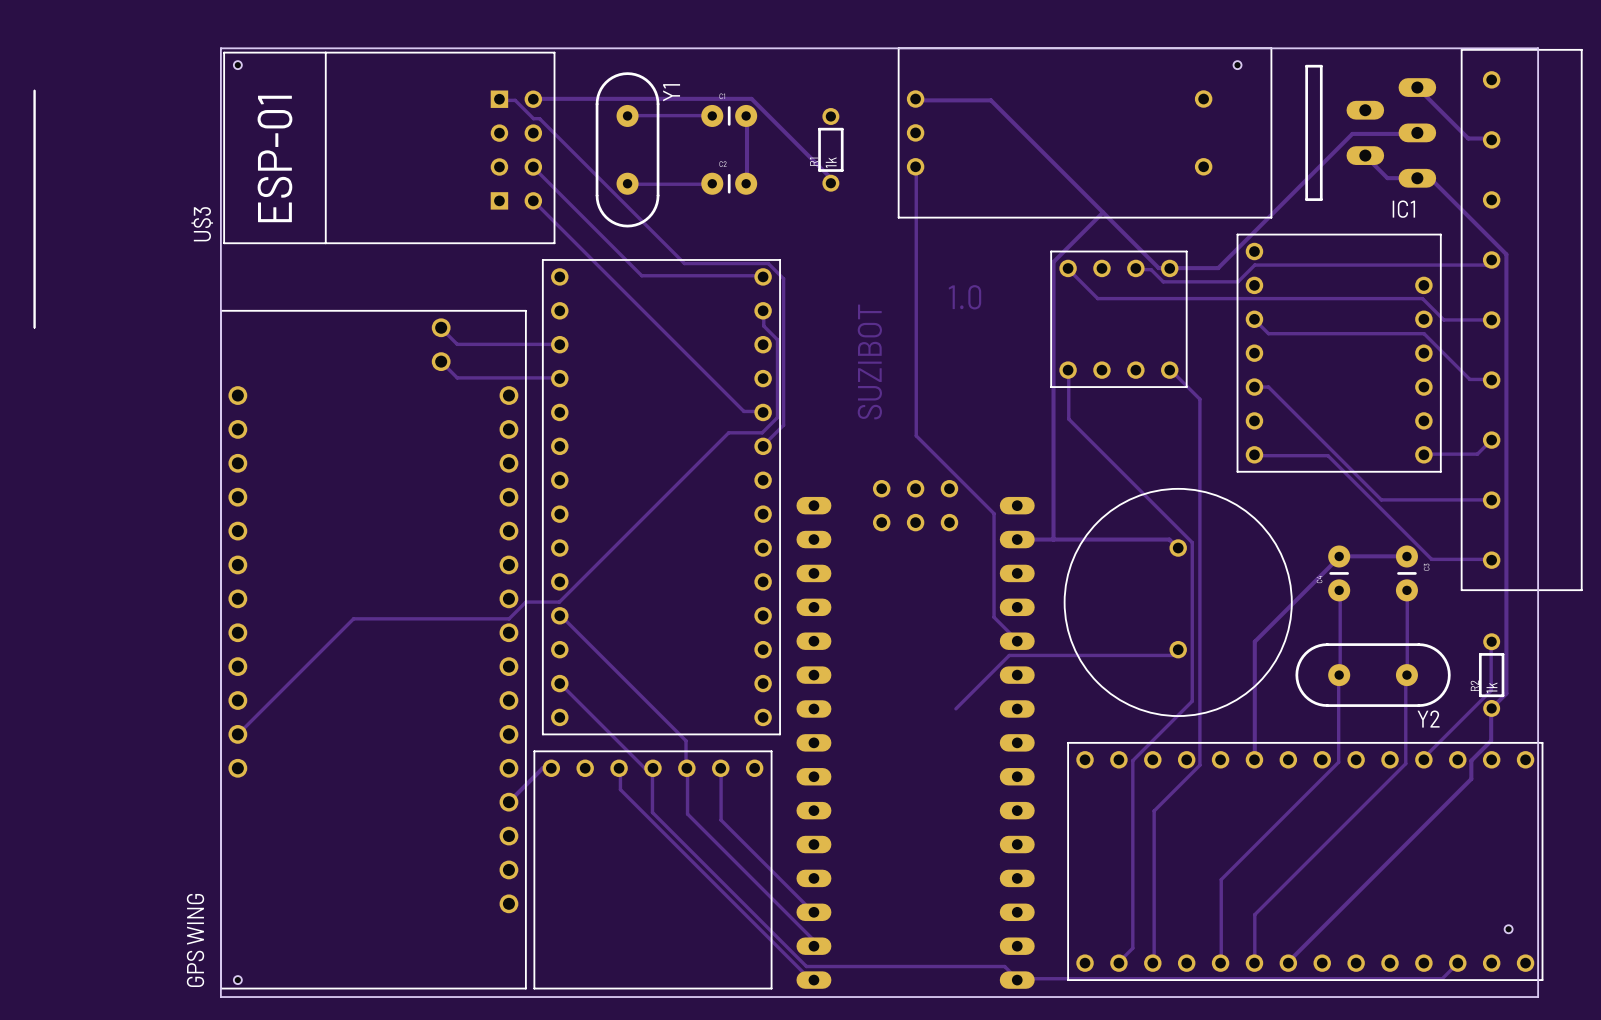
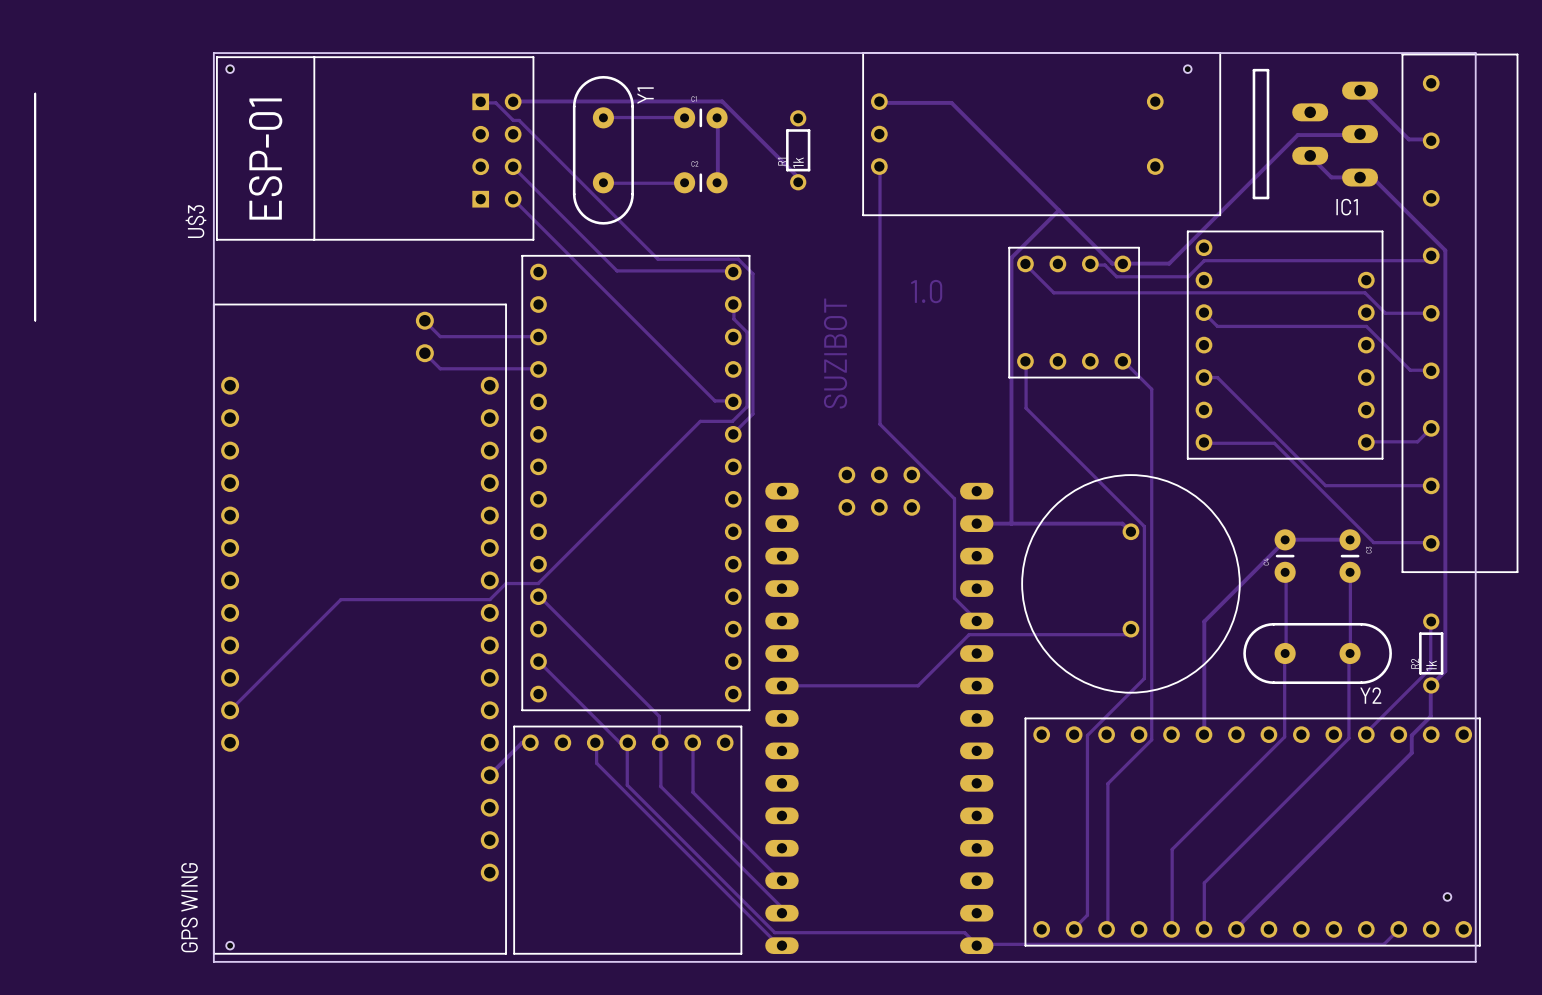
track: none -> (782, 685) (917, 685)

